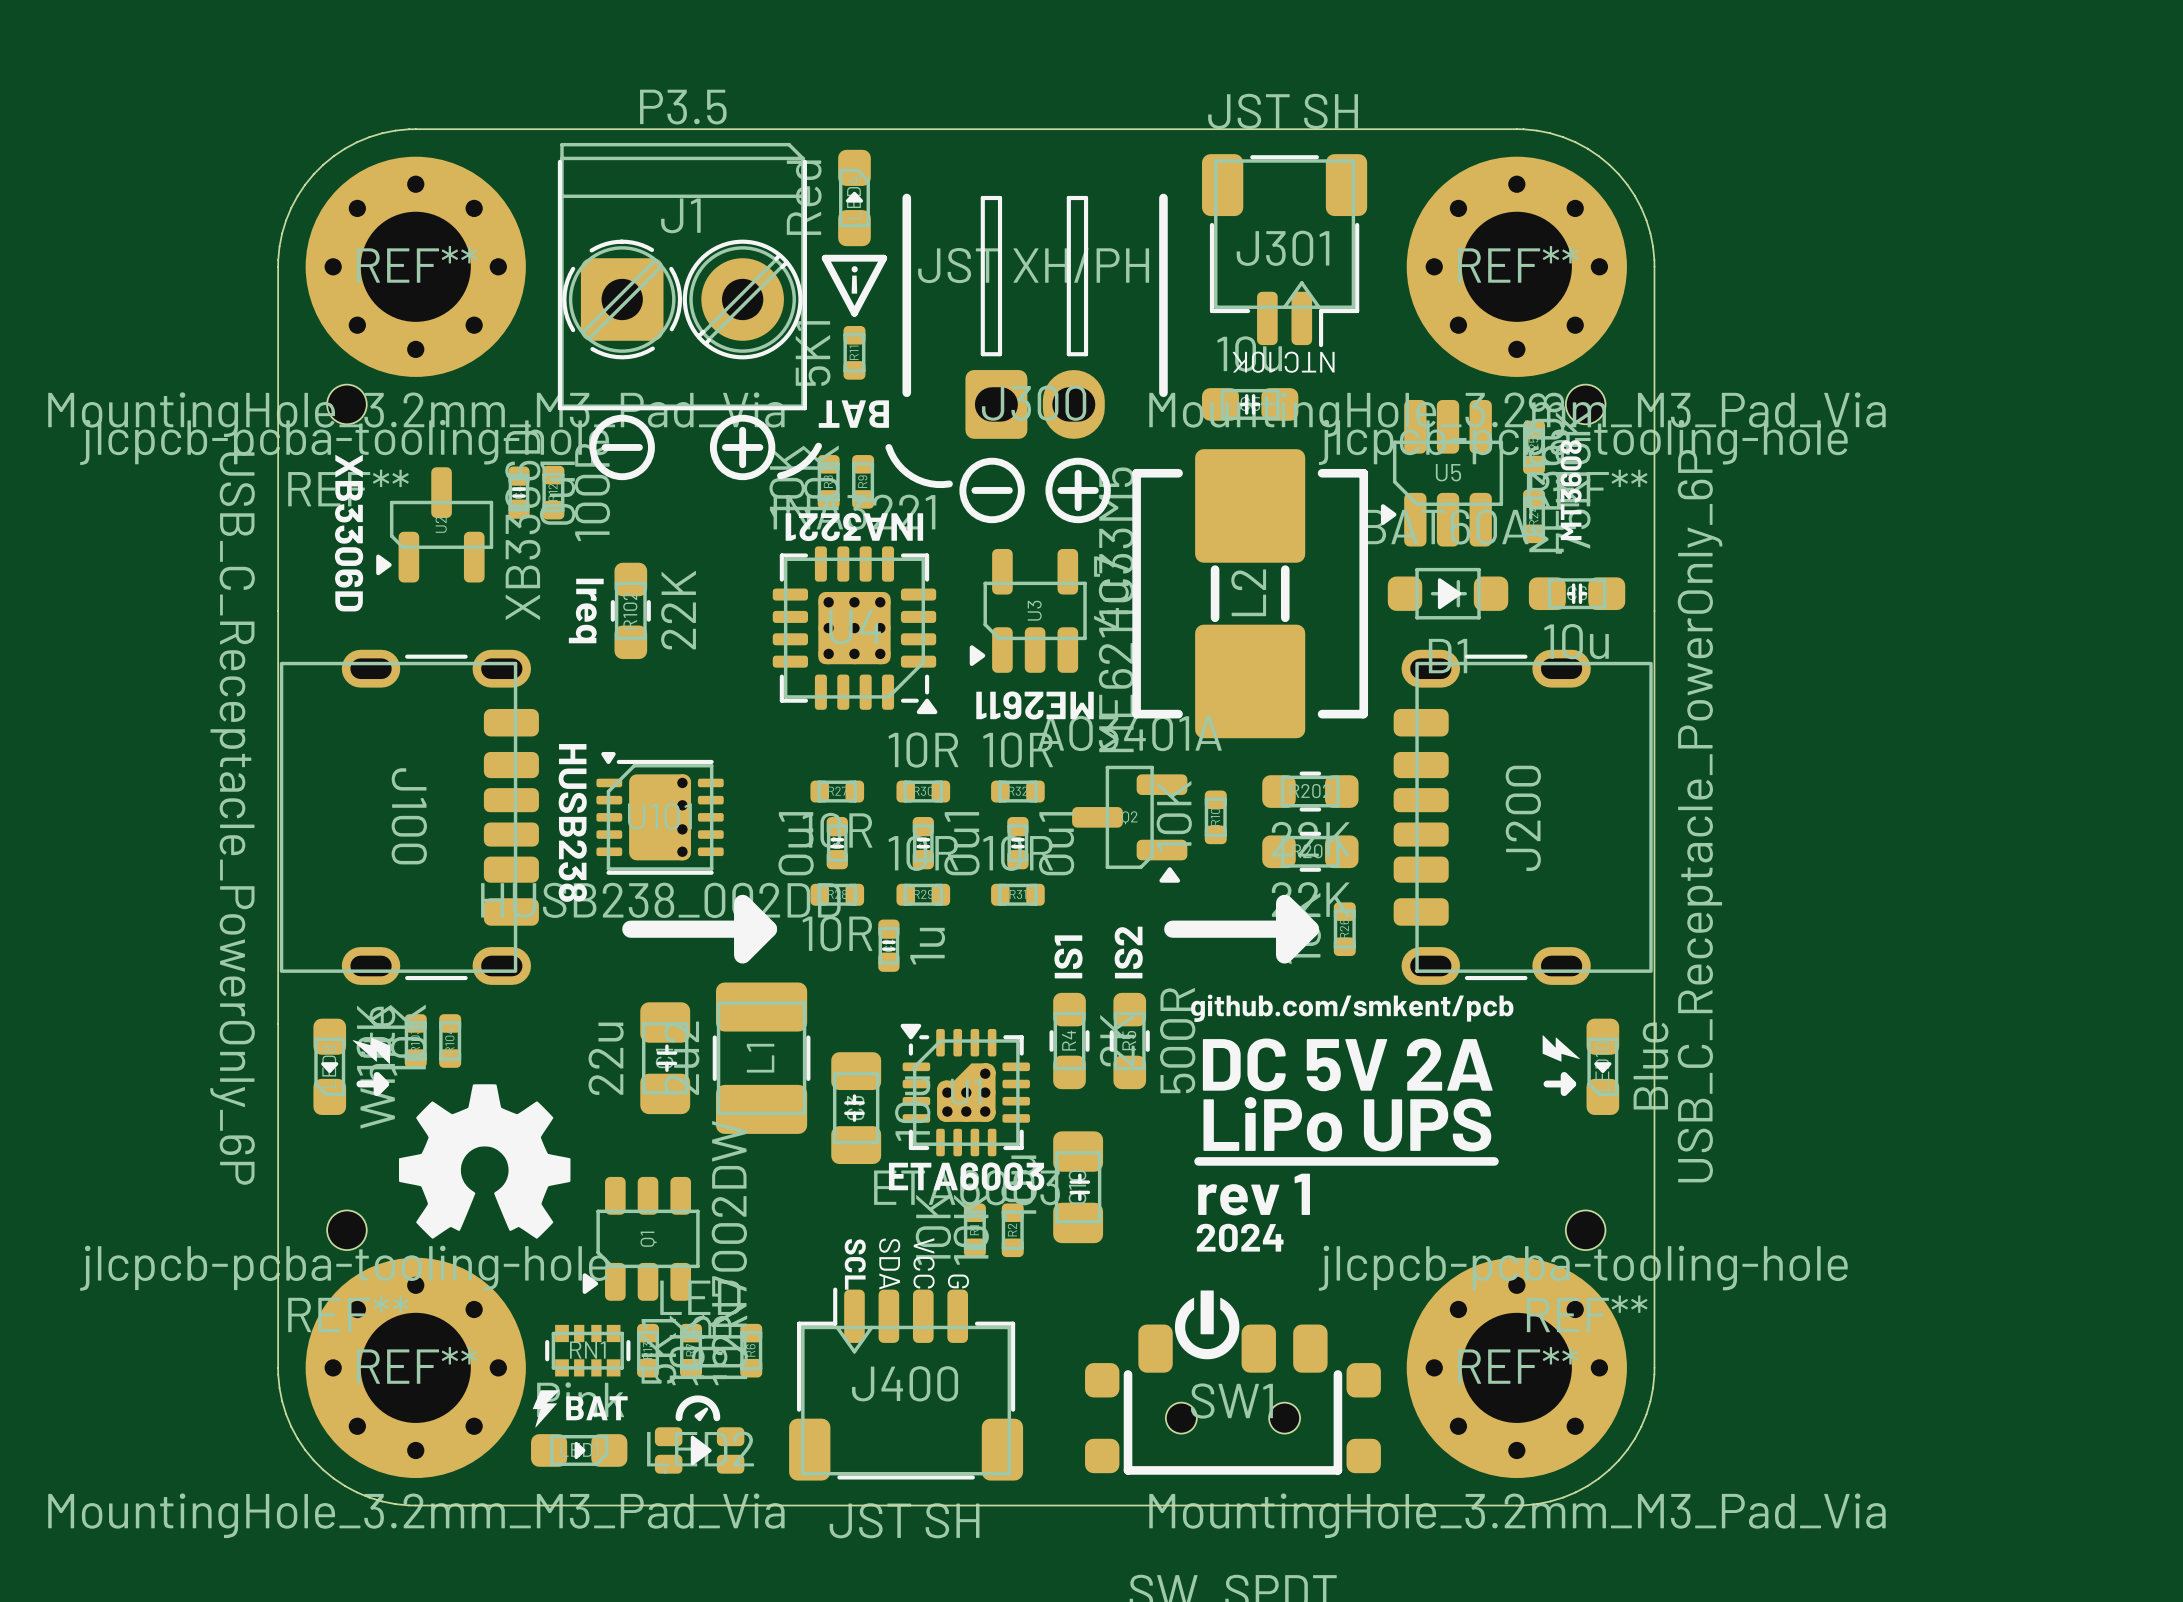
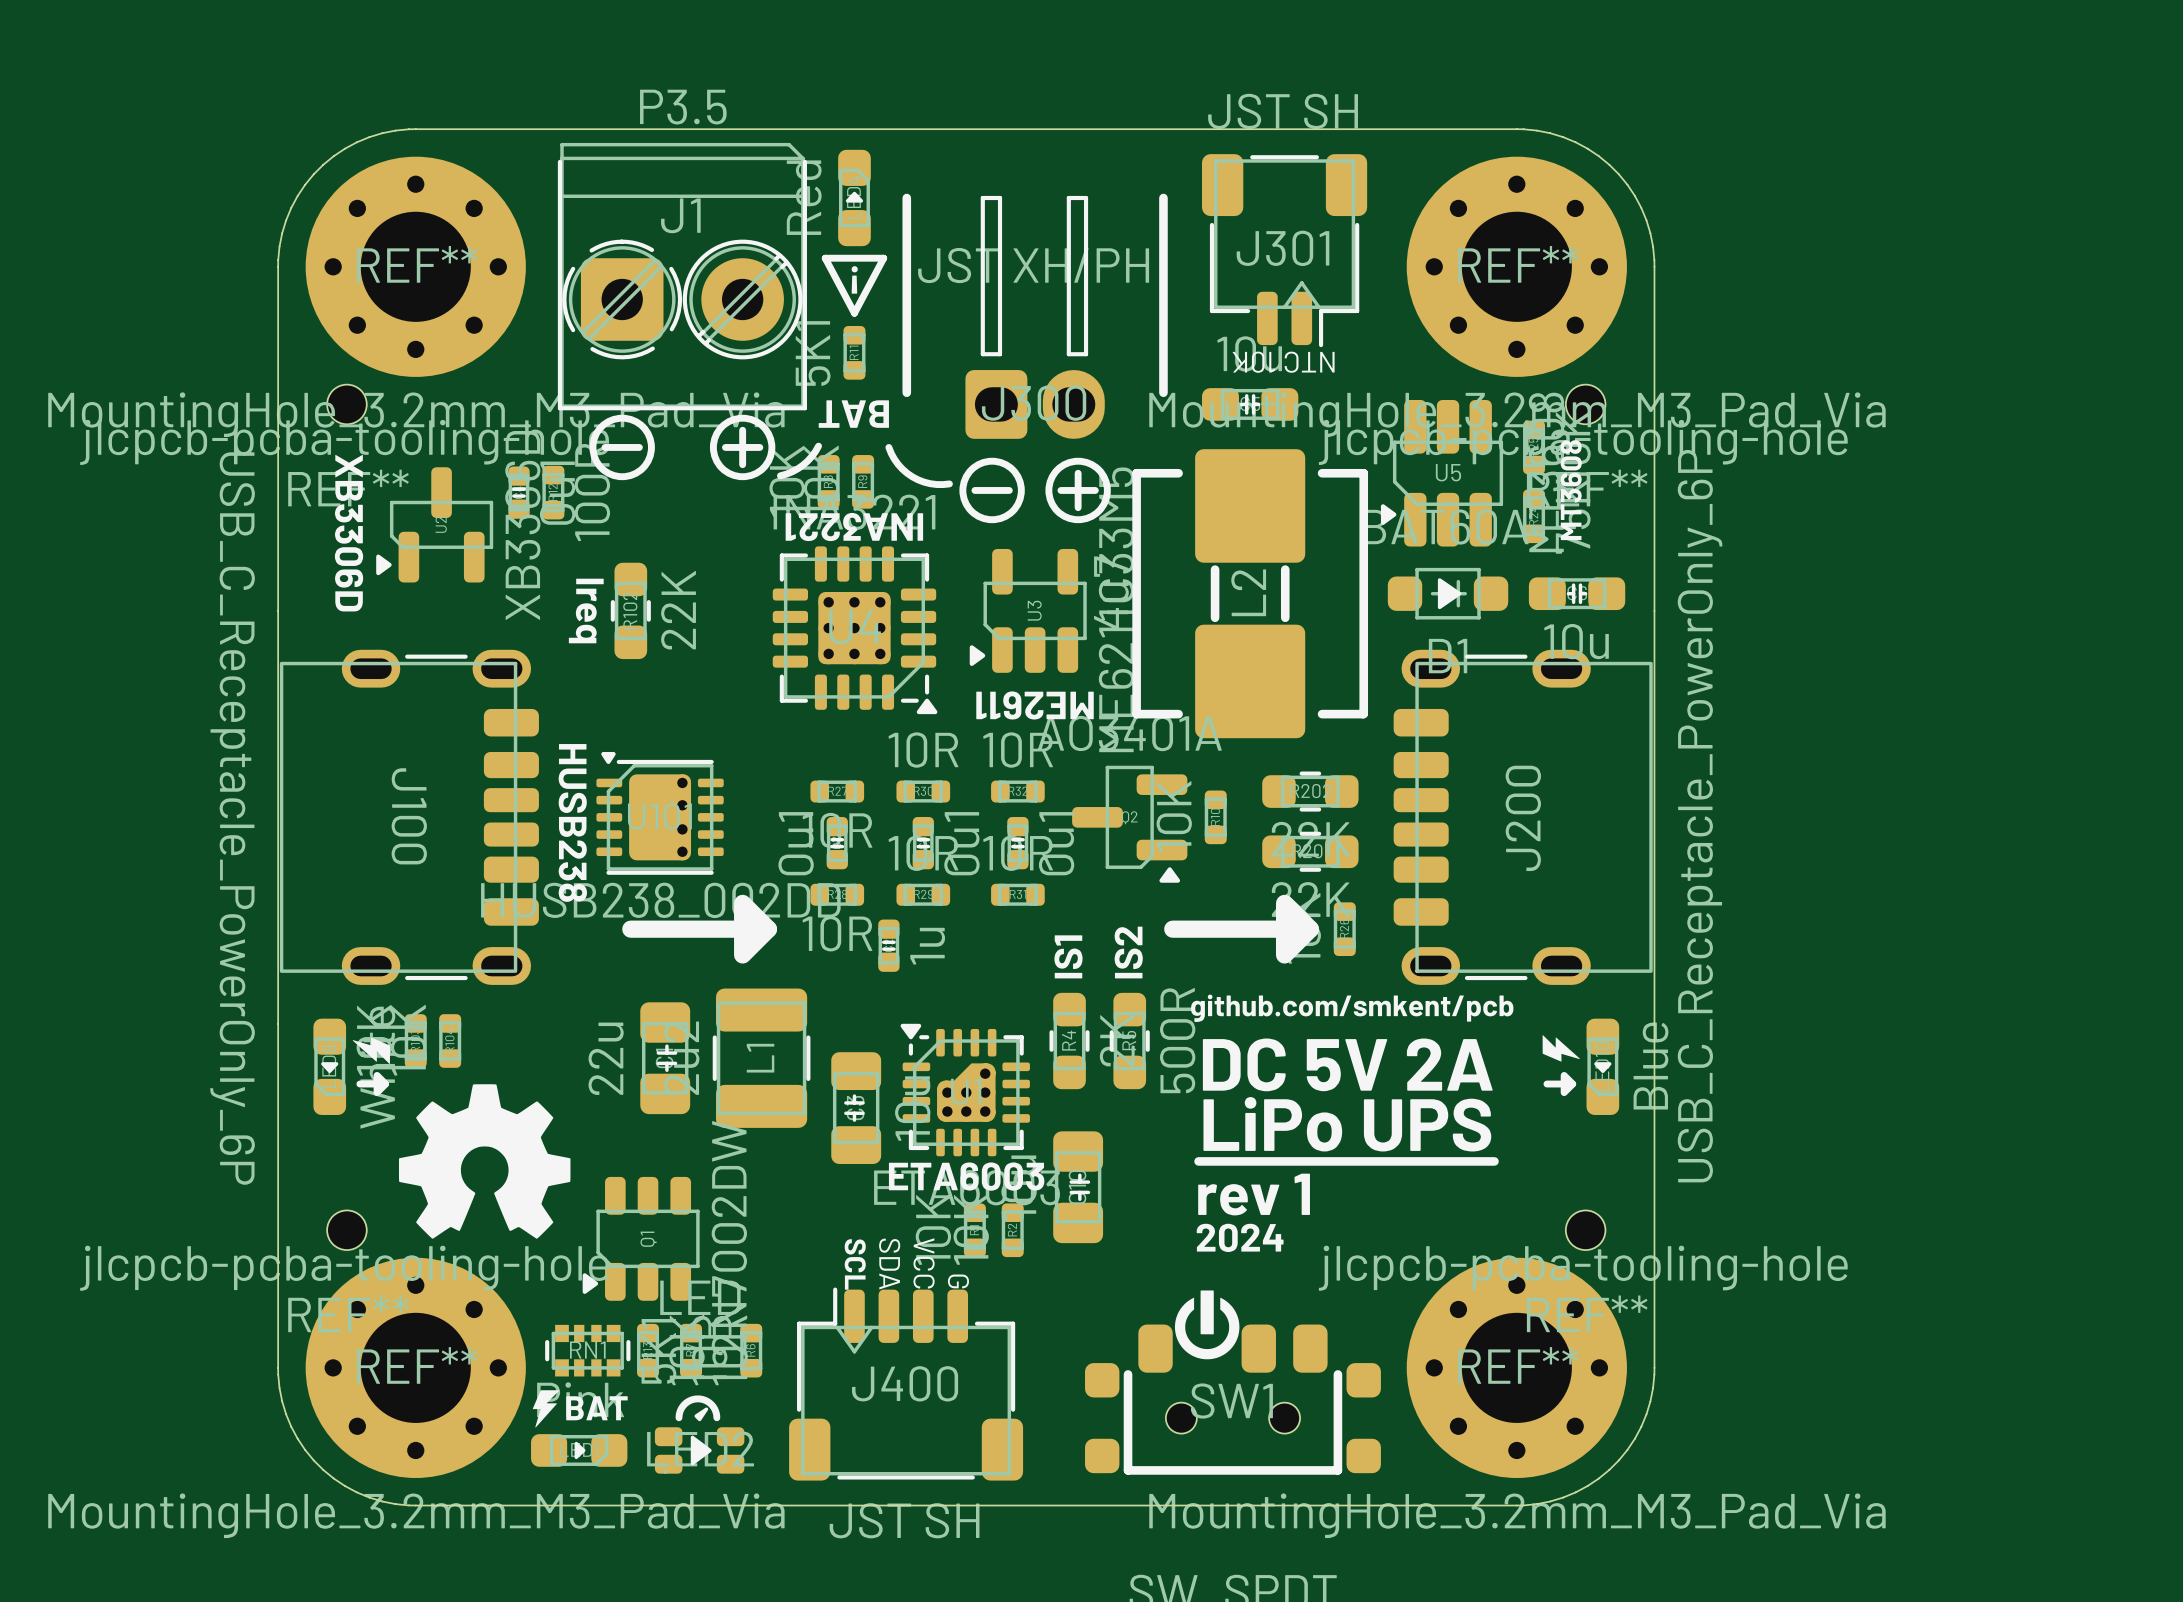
L1 footprint: [712, 982, 811, 1134] -> [712, 988, 811, 1128]

